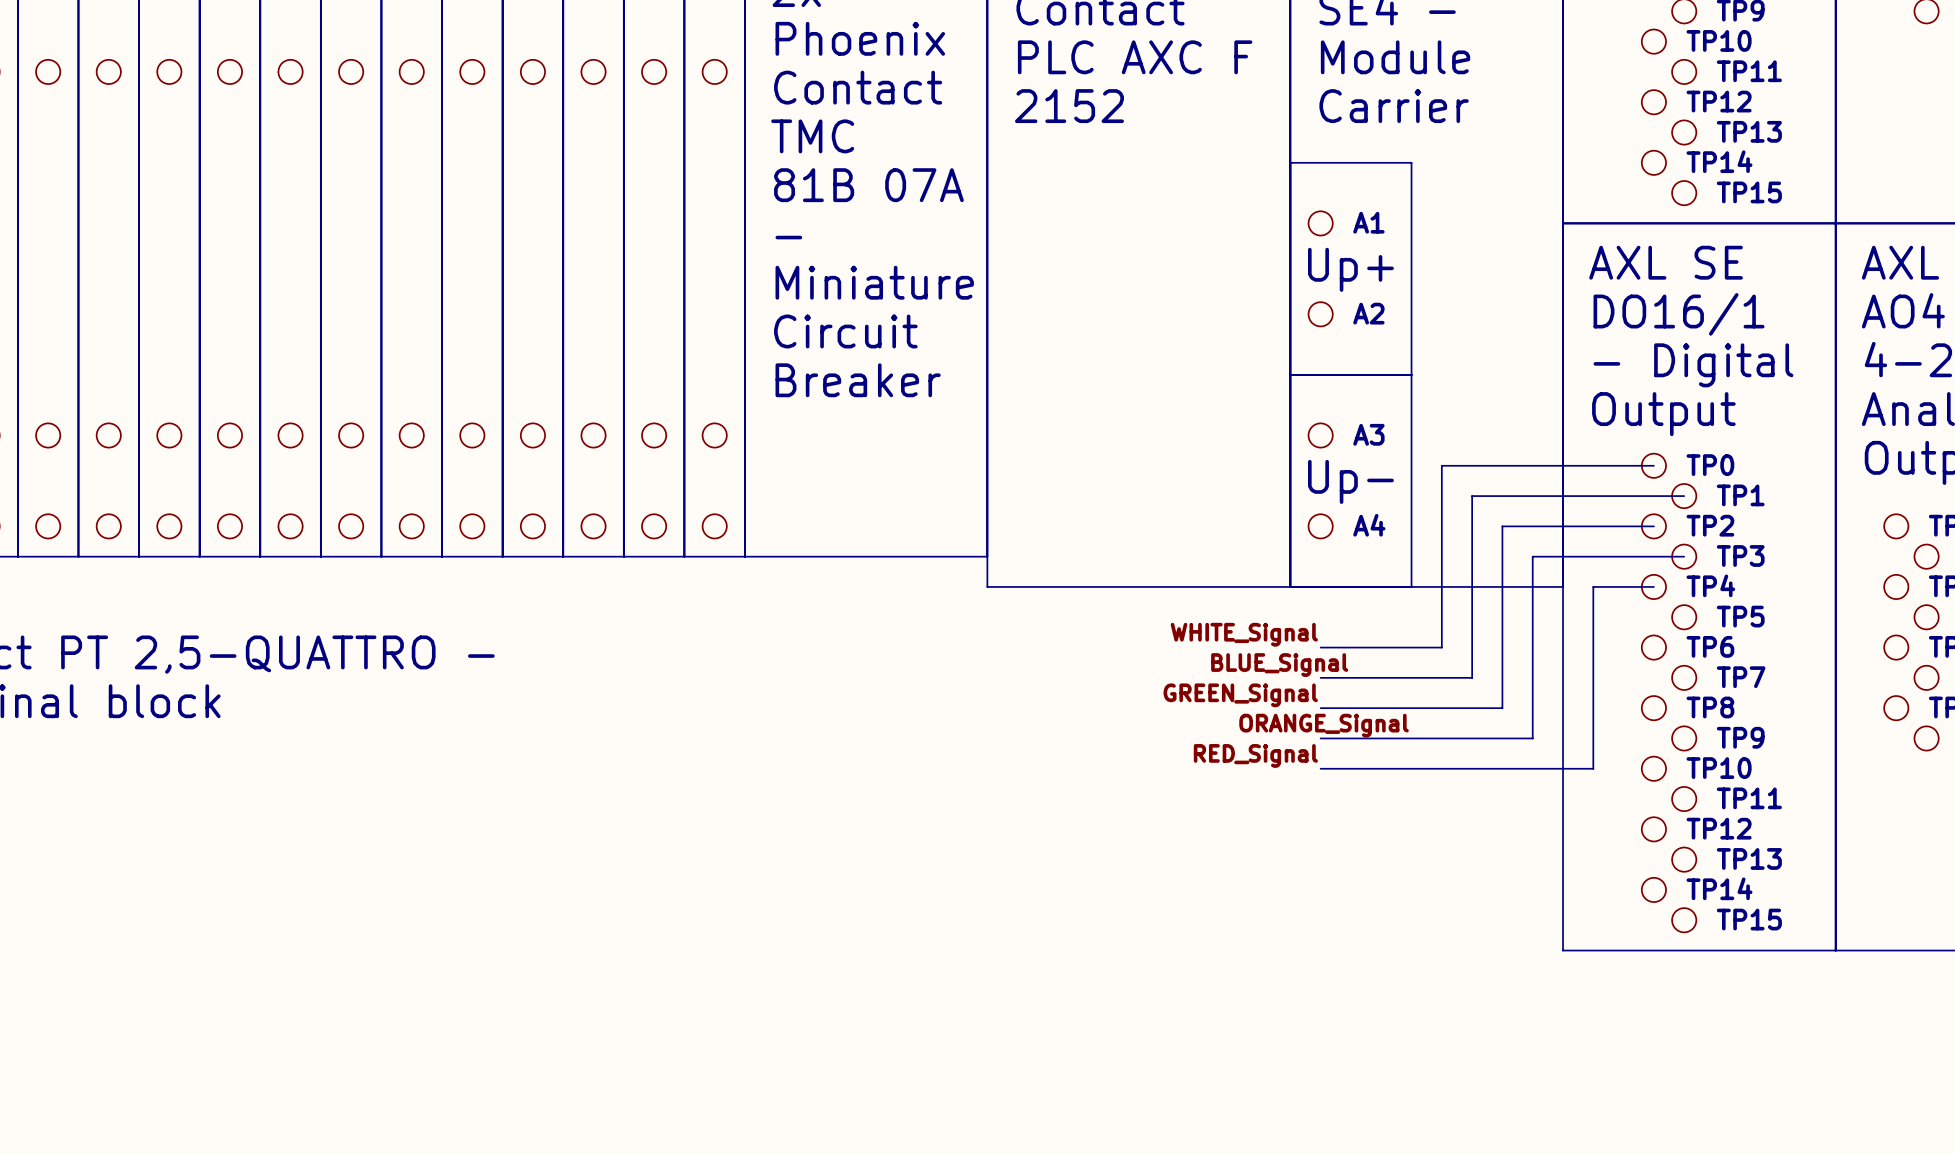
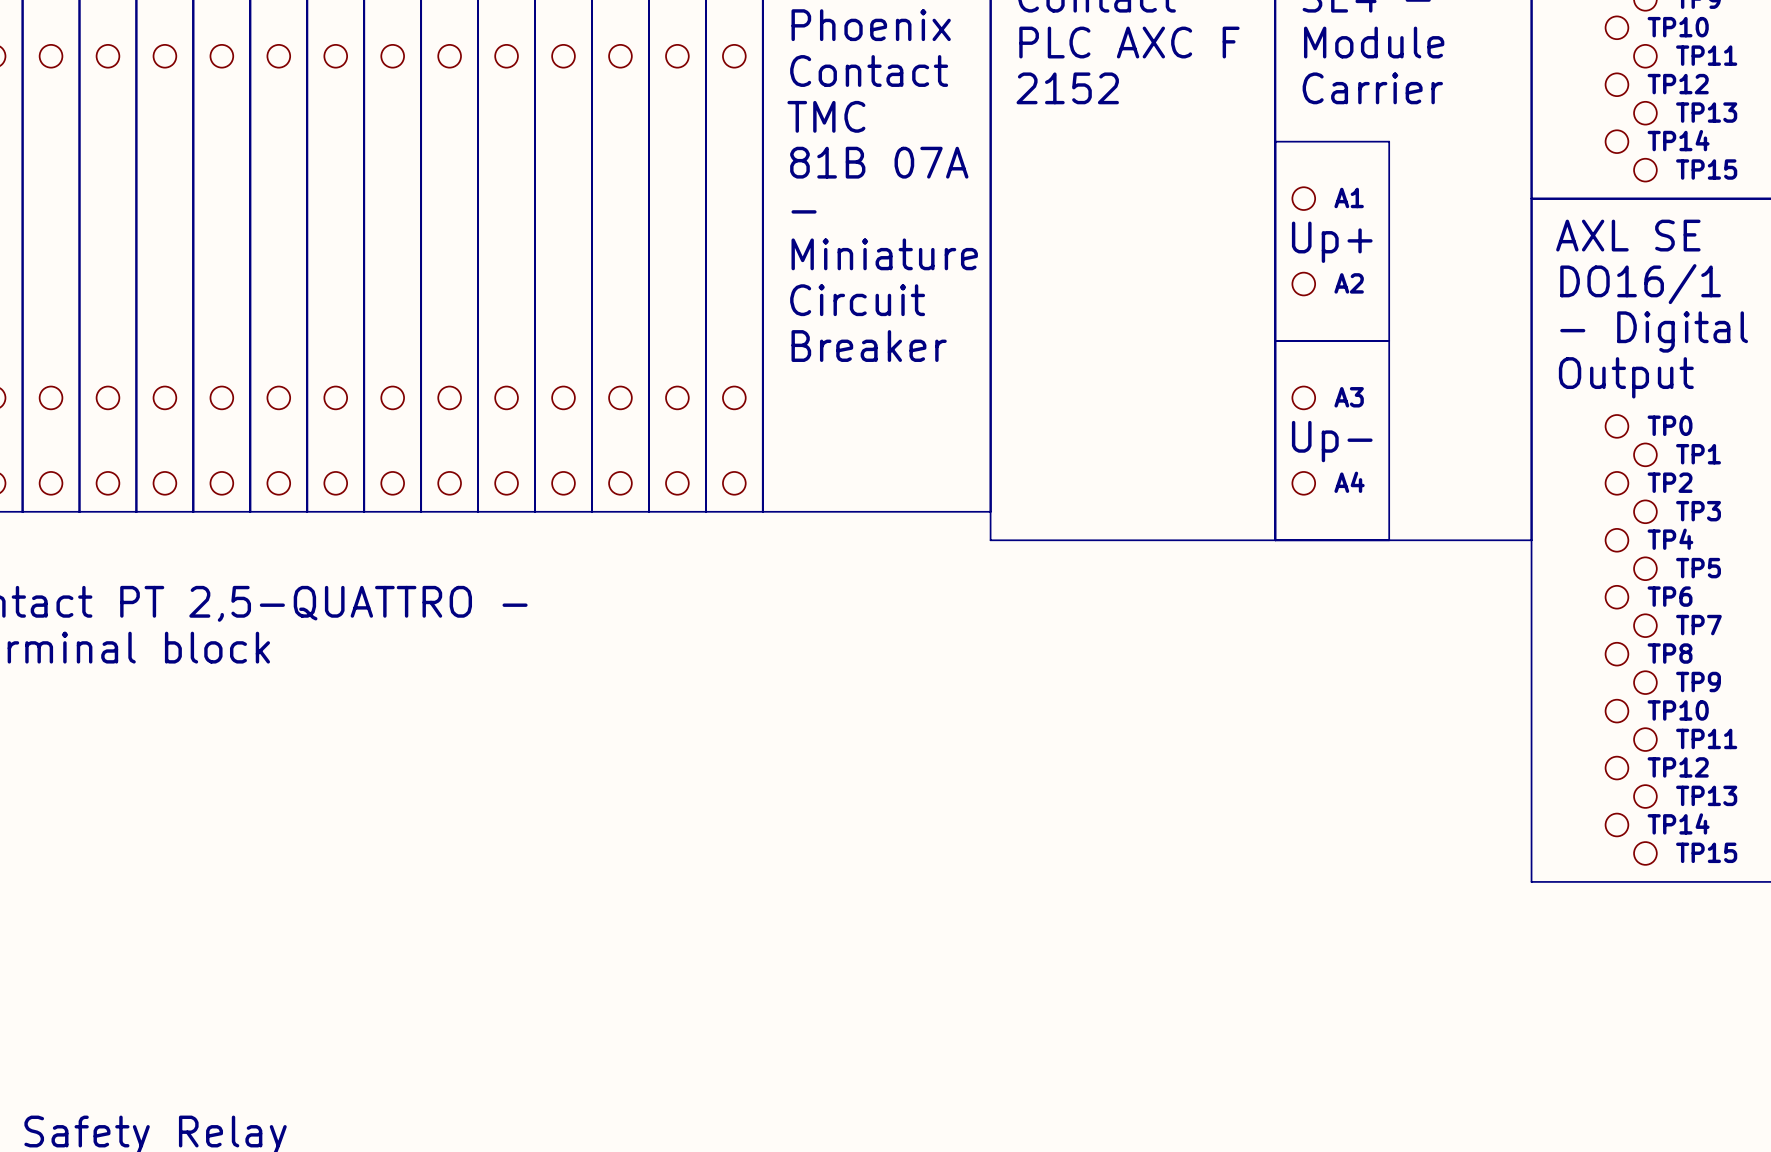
wire: (1653, 465) (1441, 465) (1441, 647) (1320, 647) -> none
wire: (1684, 496) (1472, 496) (1472, 677) (1320, 677) -> none
wire: (1653, 526) (1502, 526) (1502, 708) (1320, 708) -> none
wire: (1684, 556) (1532, 556) (1532, 738) (1320, 738) -> none
wire: (1653, 586) (1593, 586) (1593, 768) (1320, 768) -> none
label: WHITE_Signal (1244, 634) -> none
label: BLUE_Signal (1279, 665) -> none
label: GREEN_Signal (1240, 695) -> none
label: ORANGE_Signal (1324, 725) -> none
label: RED_Signal (1255, 755) -> none

